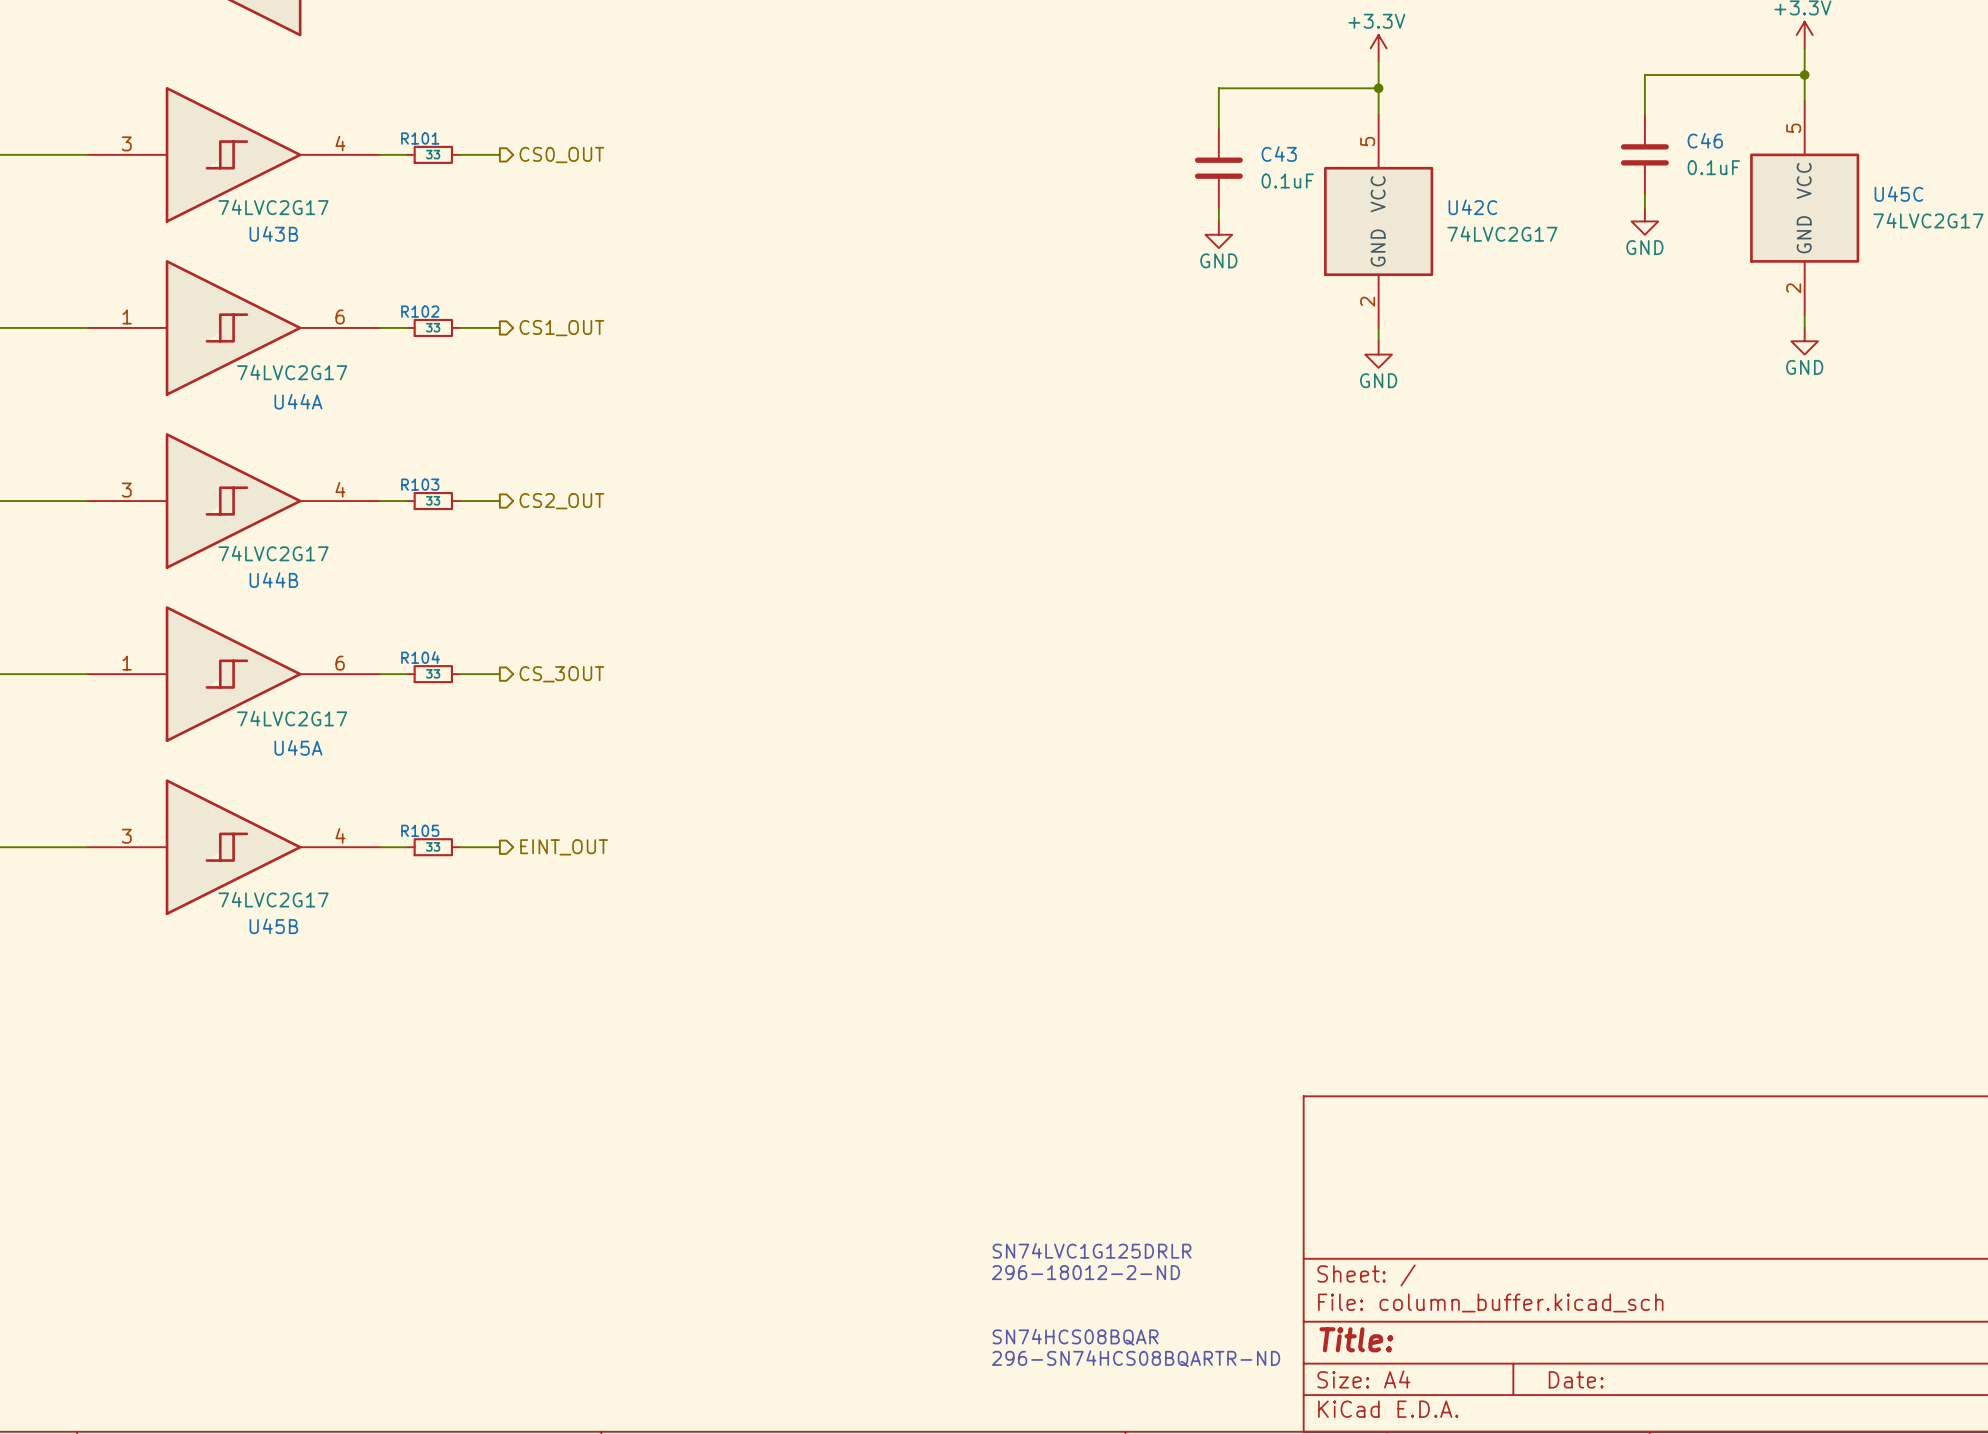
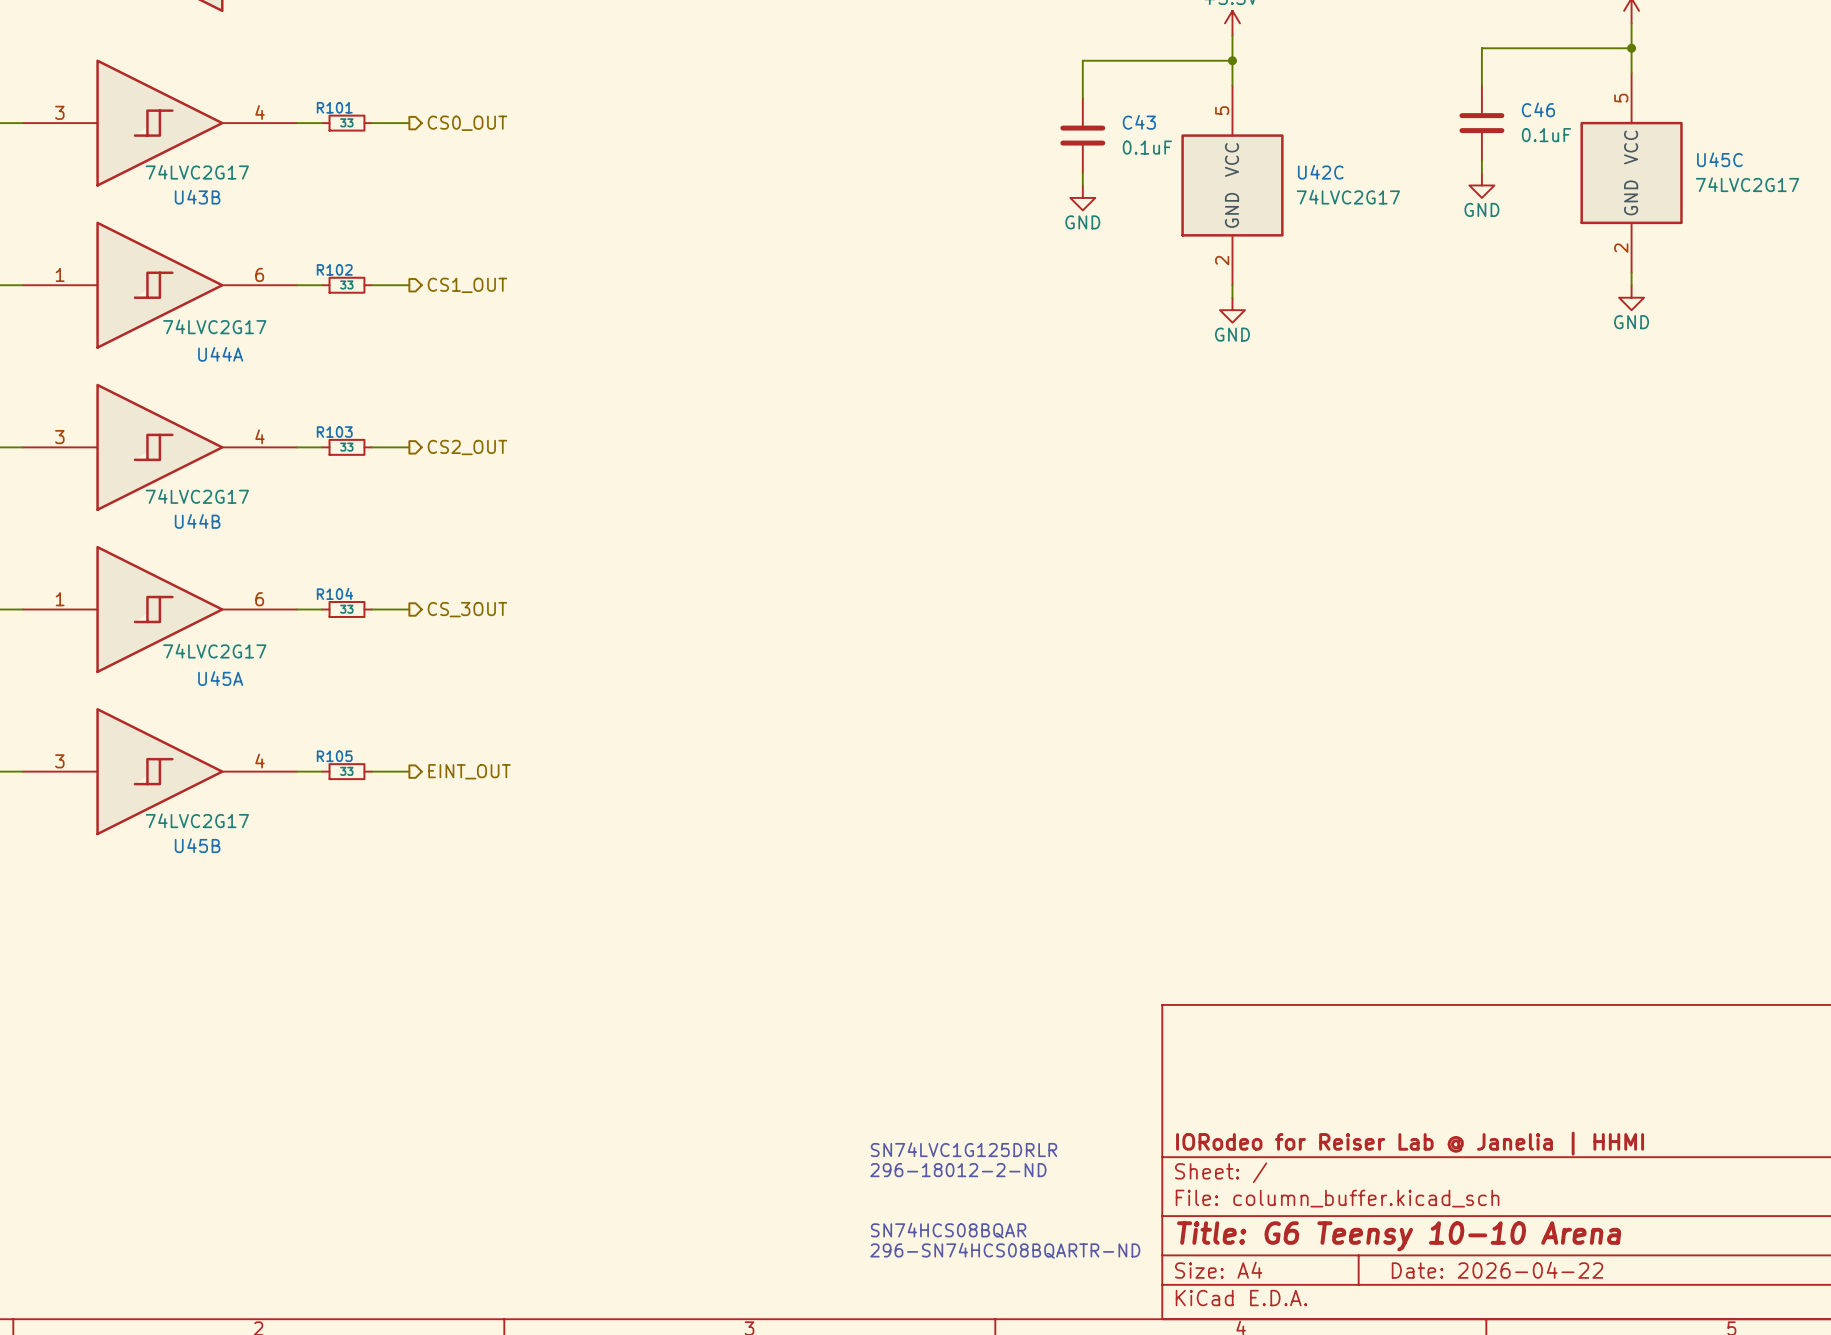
title block: none -> IORodeo for Reiser Lab @ Janelia | HHMI (1410, 1143)
title block: Title: (1356, 1339) -> Title: G6 Teensy 10-10 Arena (1399, 1236)
title block: Date: (1576, 1379) -> Date: 2026-04-22 (1497, 1270)

